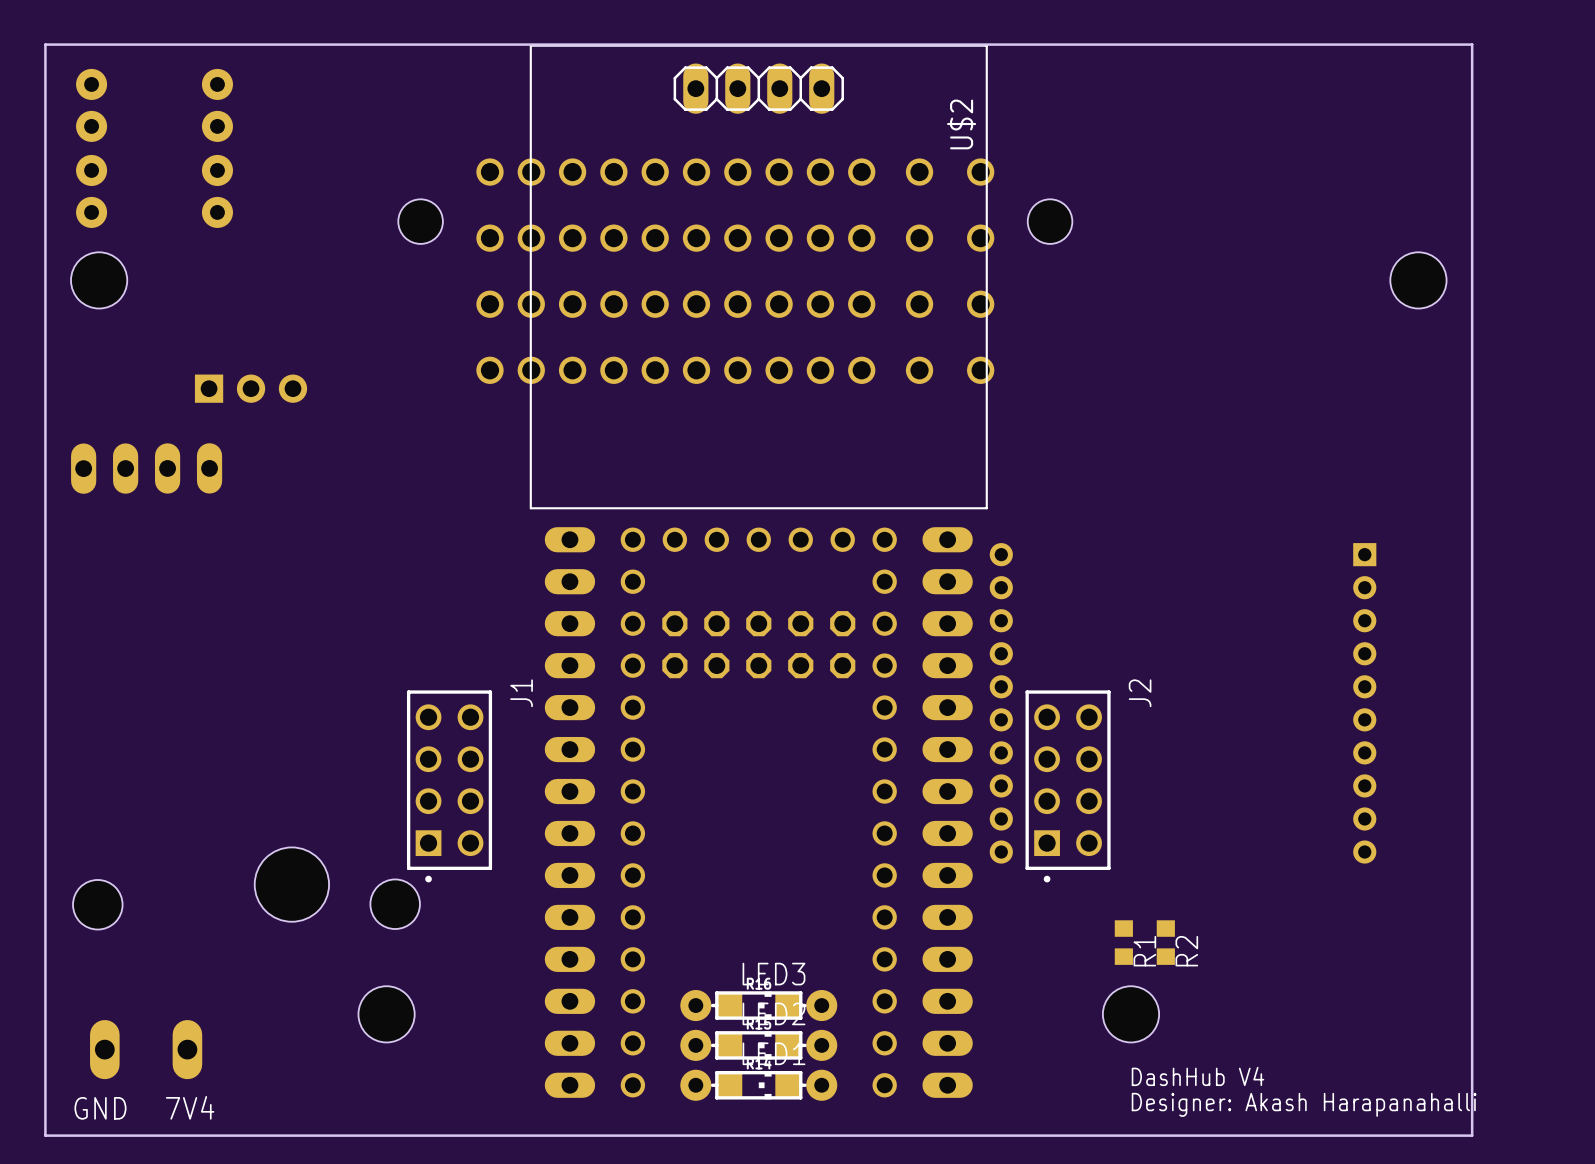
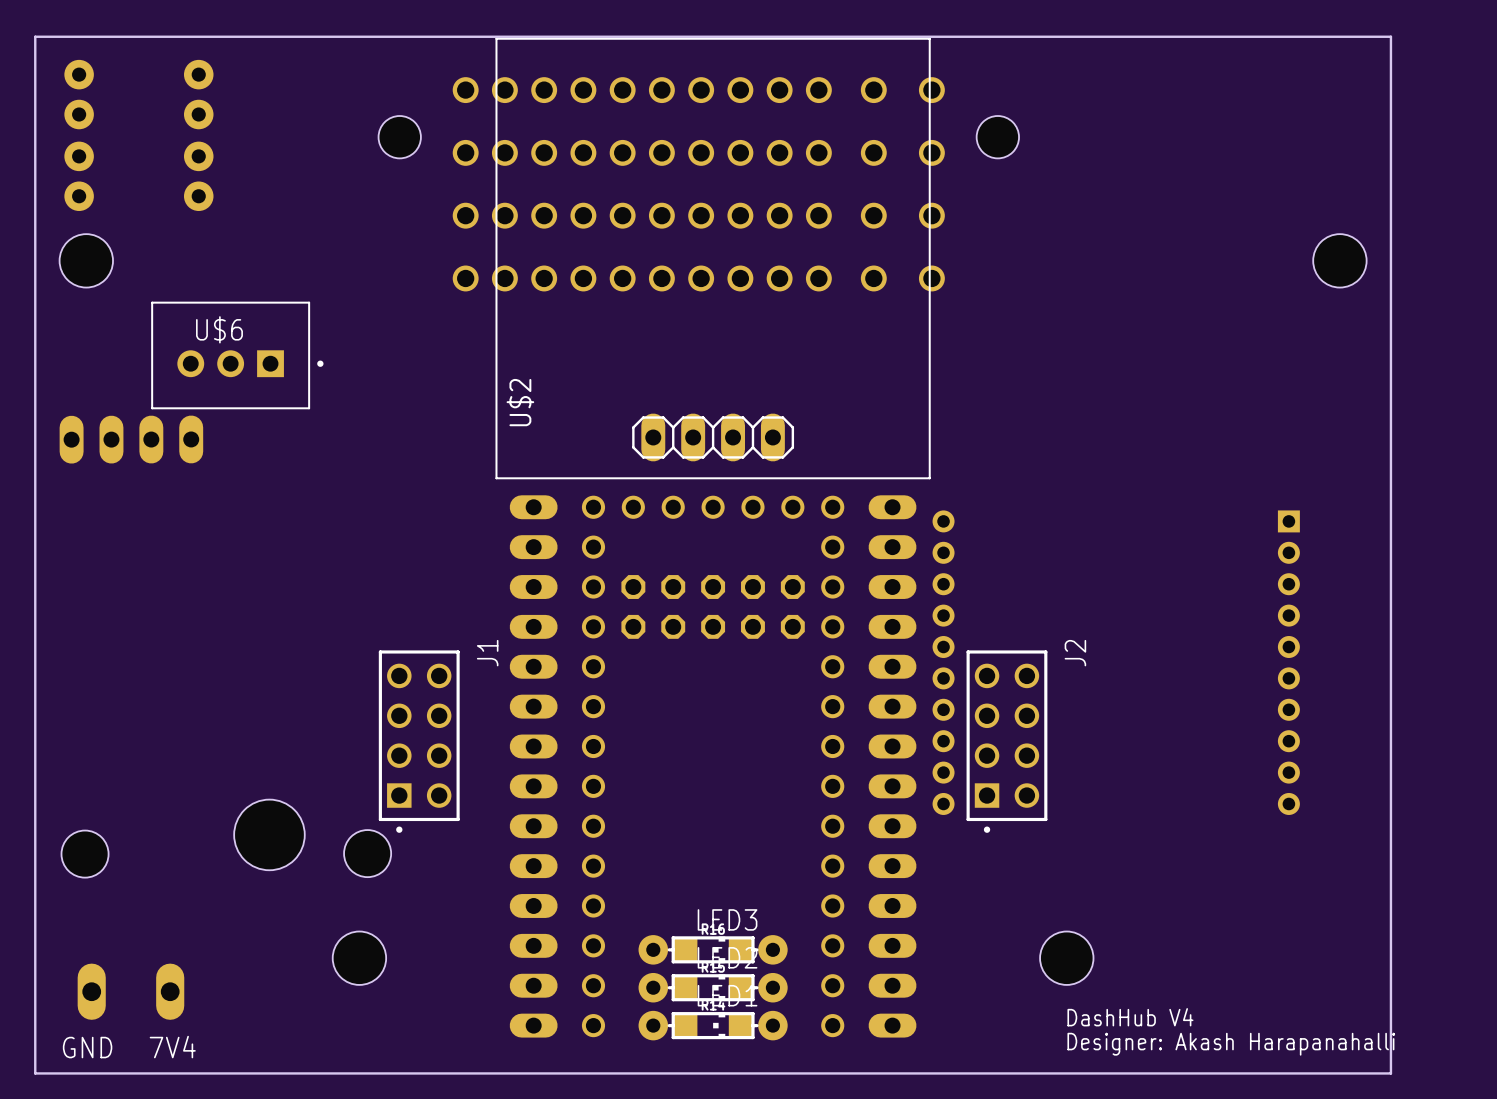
part position: (735, 271) -> (698, 184)
U$2 rotation: 0° (758, 276) -> 180° (713, 258)
U$6 side: bottom (251, 388) -> top (237, 355)
R1: (1123, 942) -> none
R2: (1165, 942) -> none

